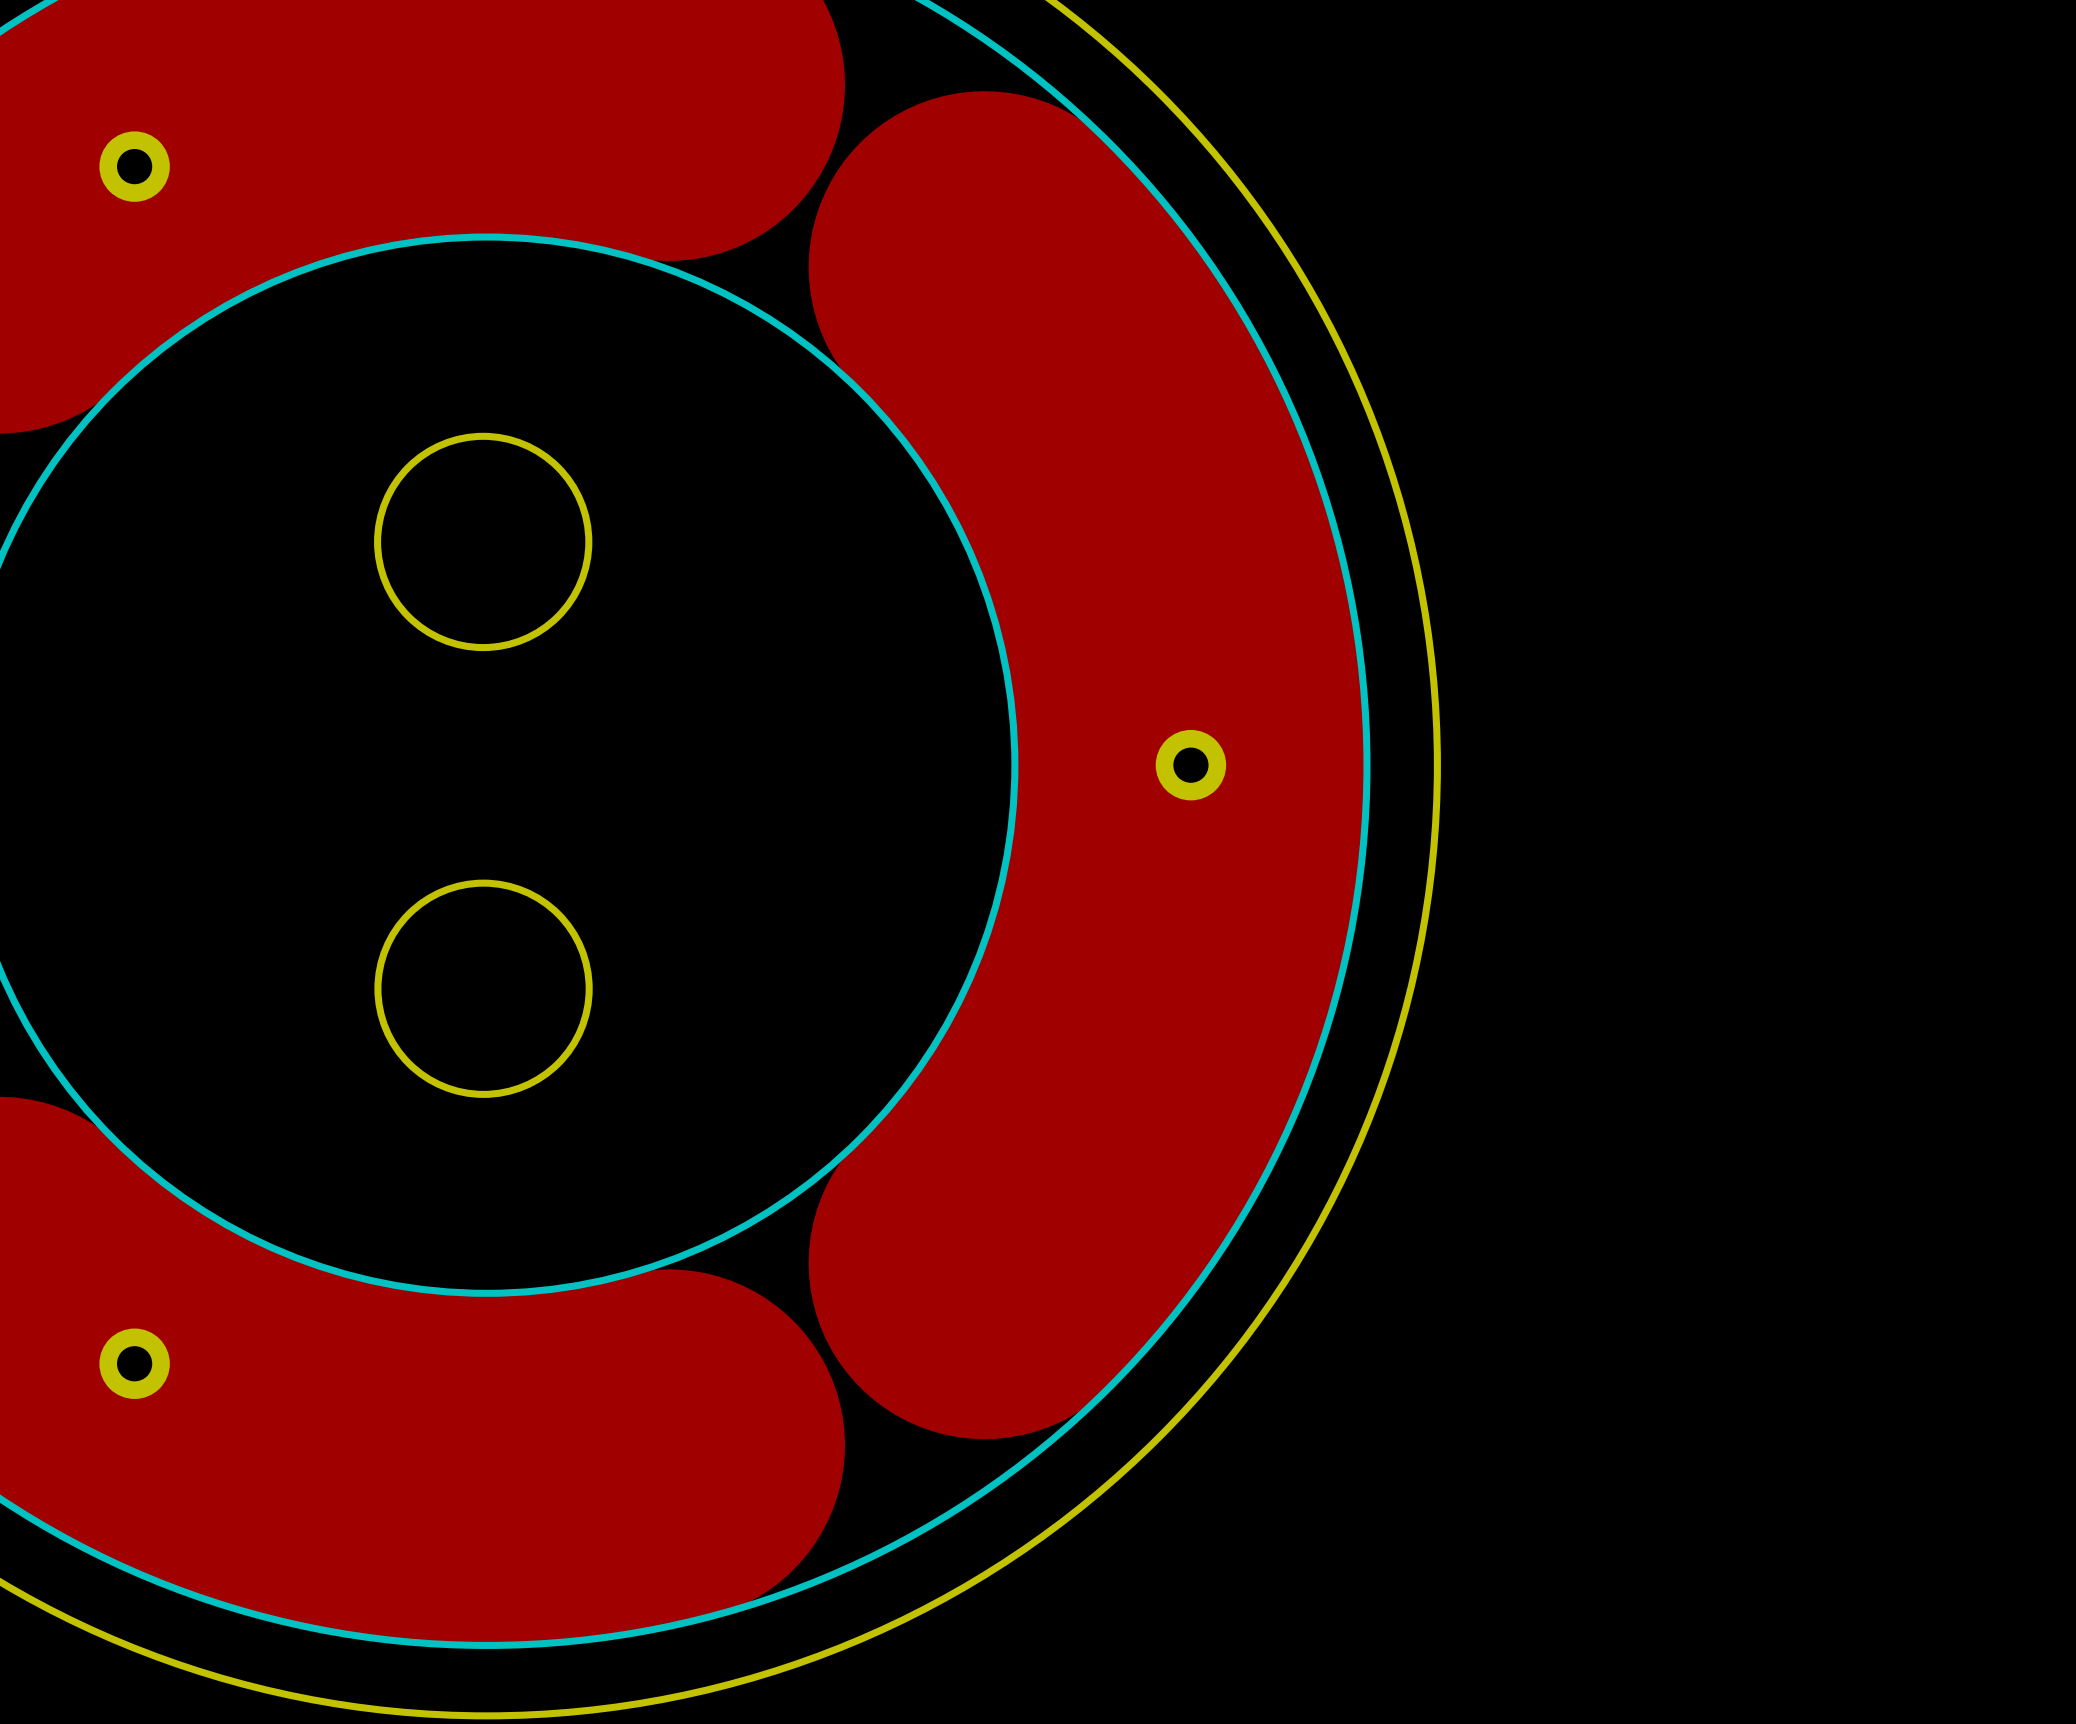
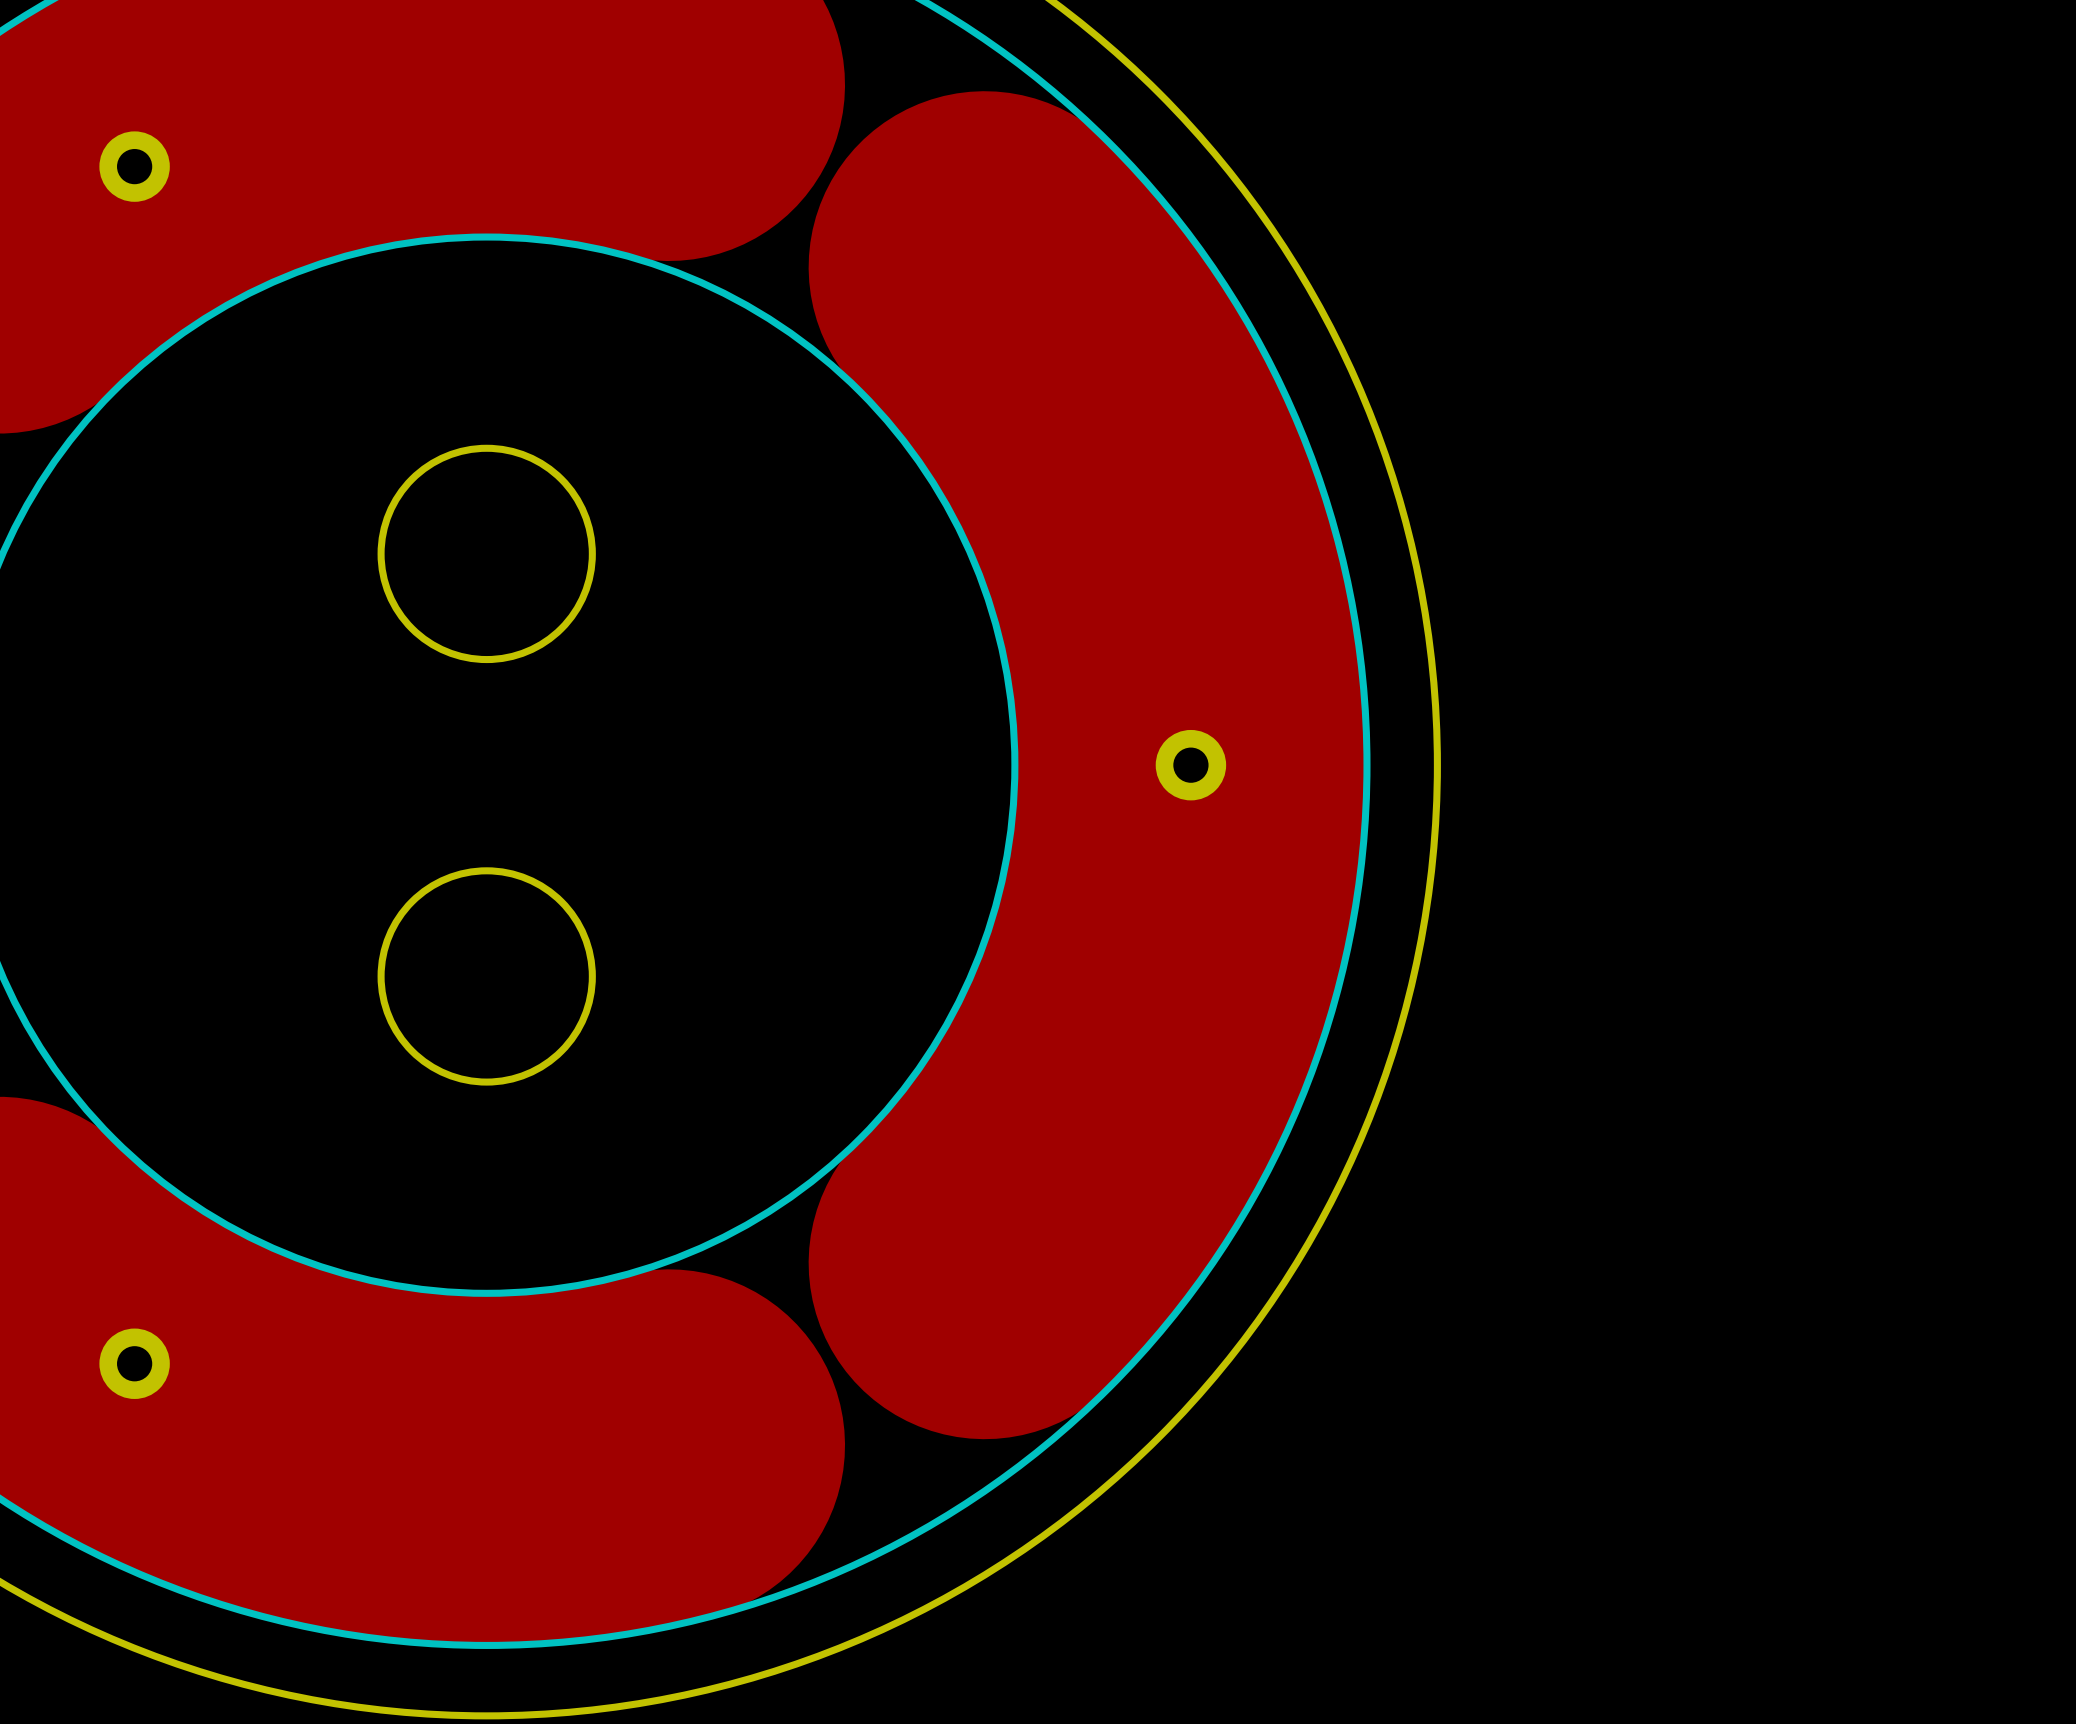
round board edge position: (483, 541) -> (486, 553)
round board edge position: (483, 988) -> (486, 976)

